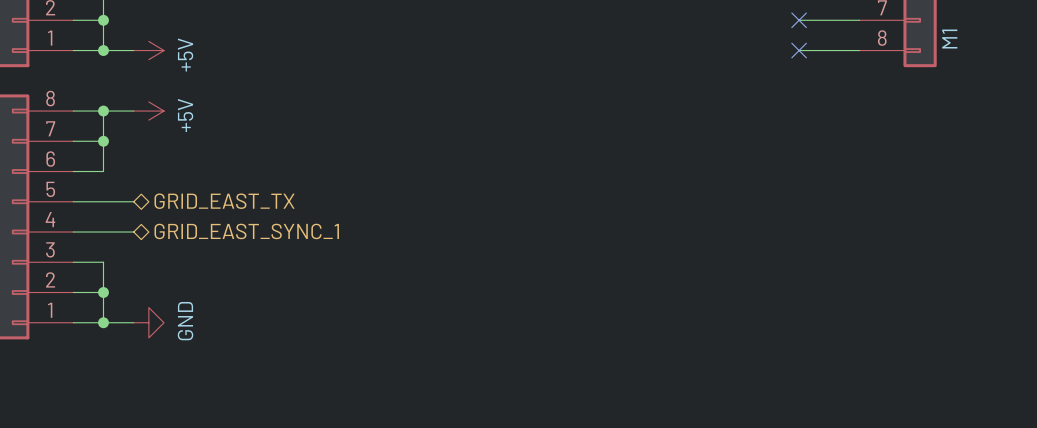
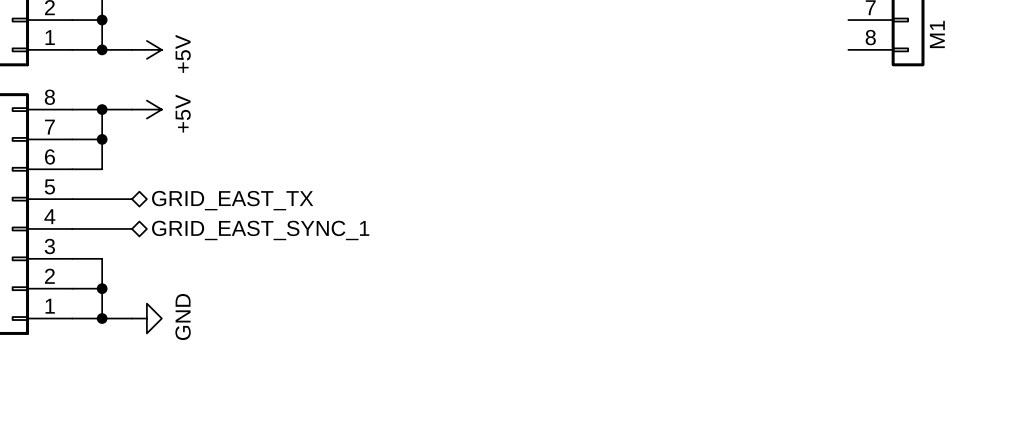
wire: (799, 20) (859, 20) -> none
no-connect mark: (799, 20) -> none
wire: (799, 50) (859, 50) -> none
no-connect mark: (799, 50) -> none

